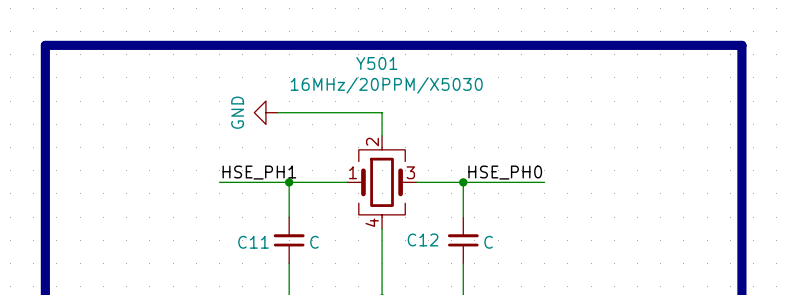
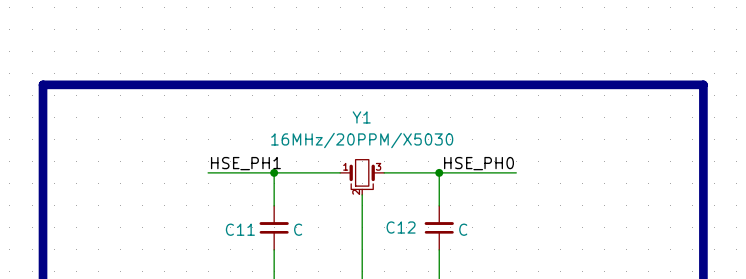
line: (45, 89) (45, 45) (741, 45) (741, 89) -> (43, 84) (703, 84)
power symbol: GND (265, 112) -> none
wire: (277, 112) (382, 112) (382, 135) -> none
Y501: 16MHz/20PPM/X5030 (382, 182) -> none
Y1: none -> 16MHz/20PPM/X5030 (362, 177)

